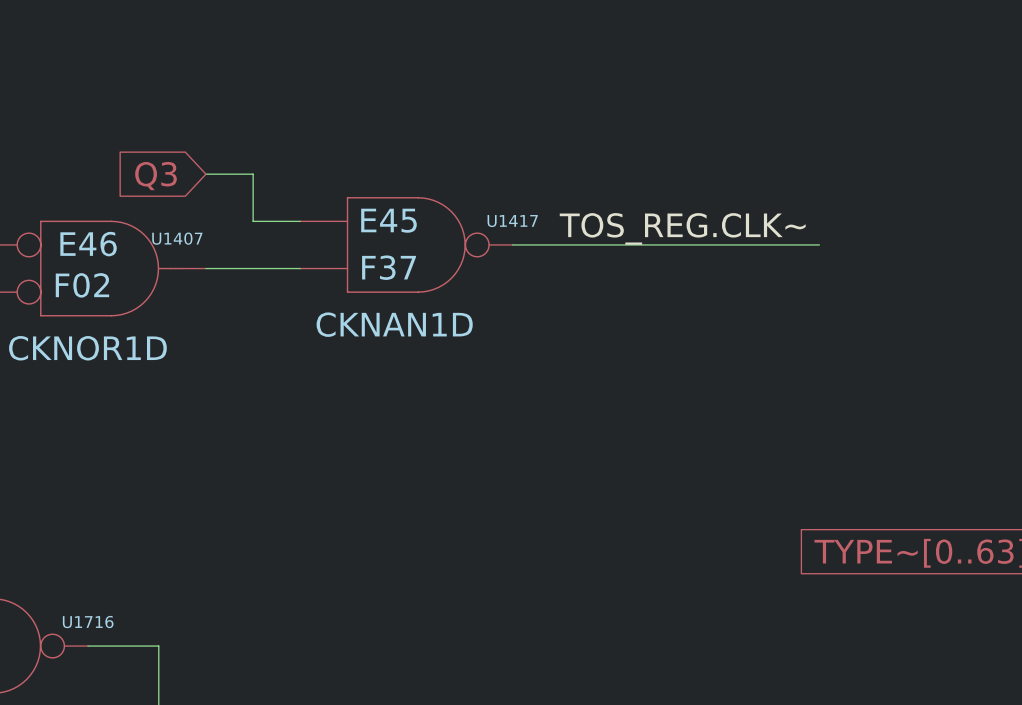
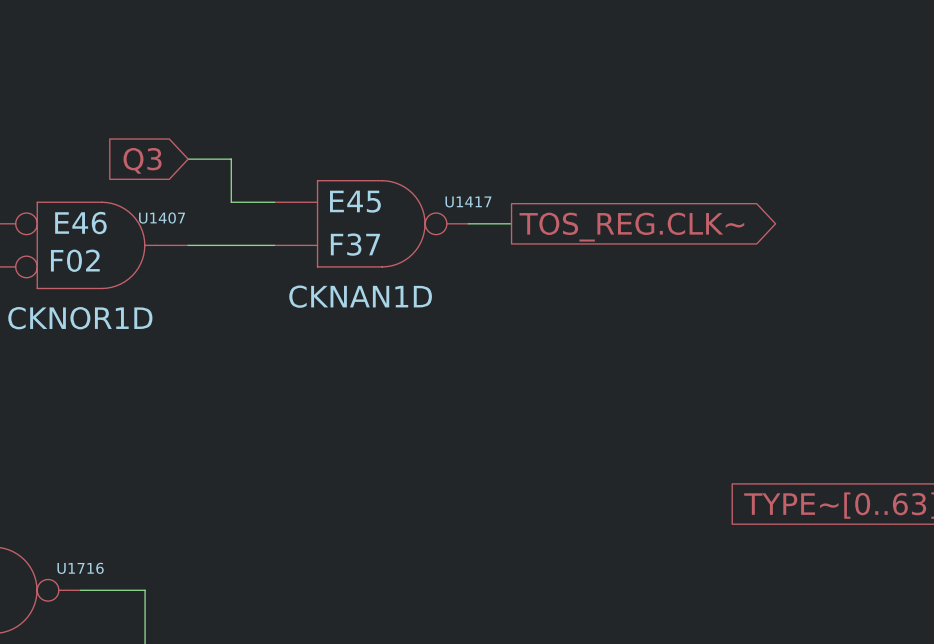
label: TOS_REG.CLK~ (682, 228) -> none
wire: (559, 244) (819, 244) -> none
global label: none -> TOS_REG.CLK~ (631, 227)

